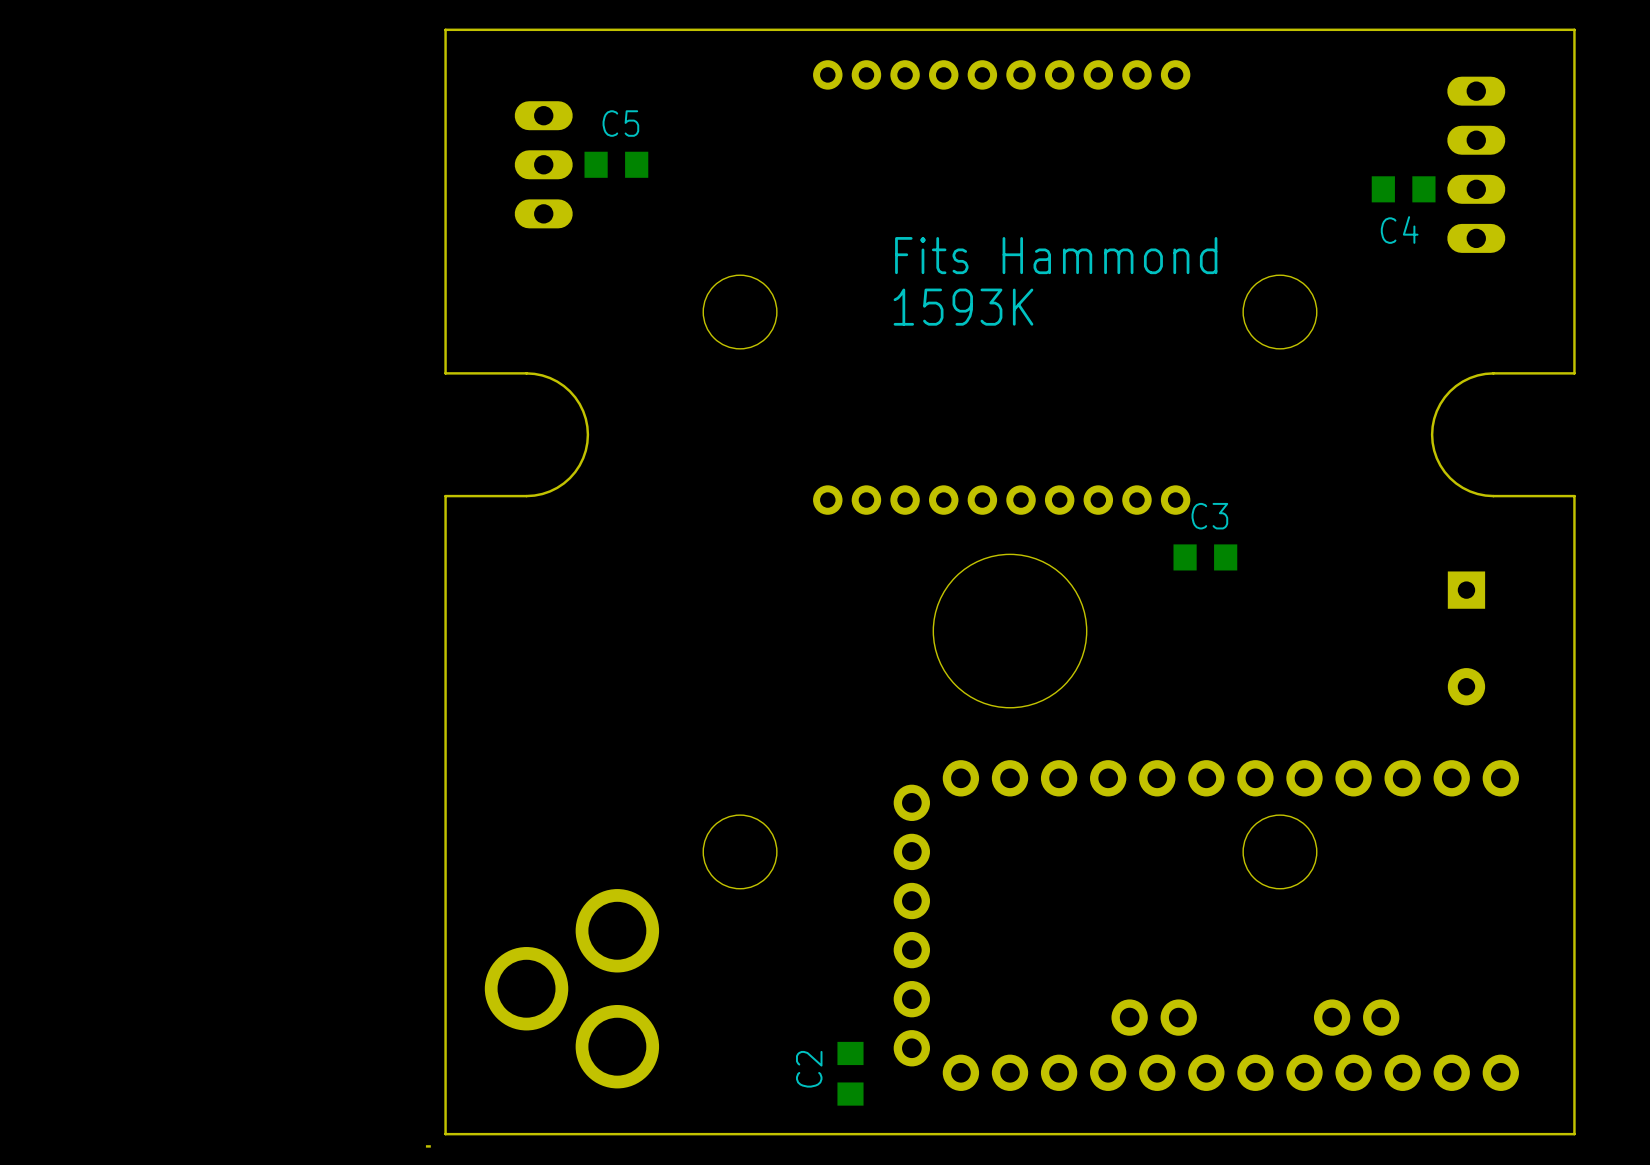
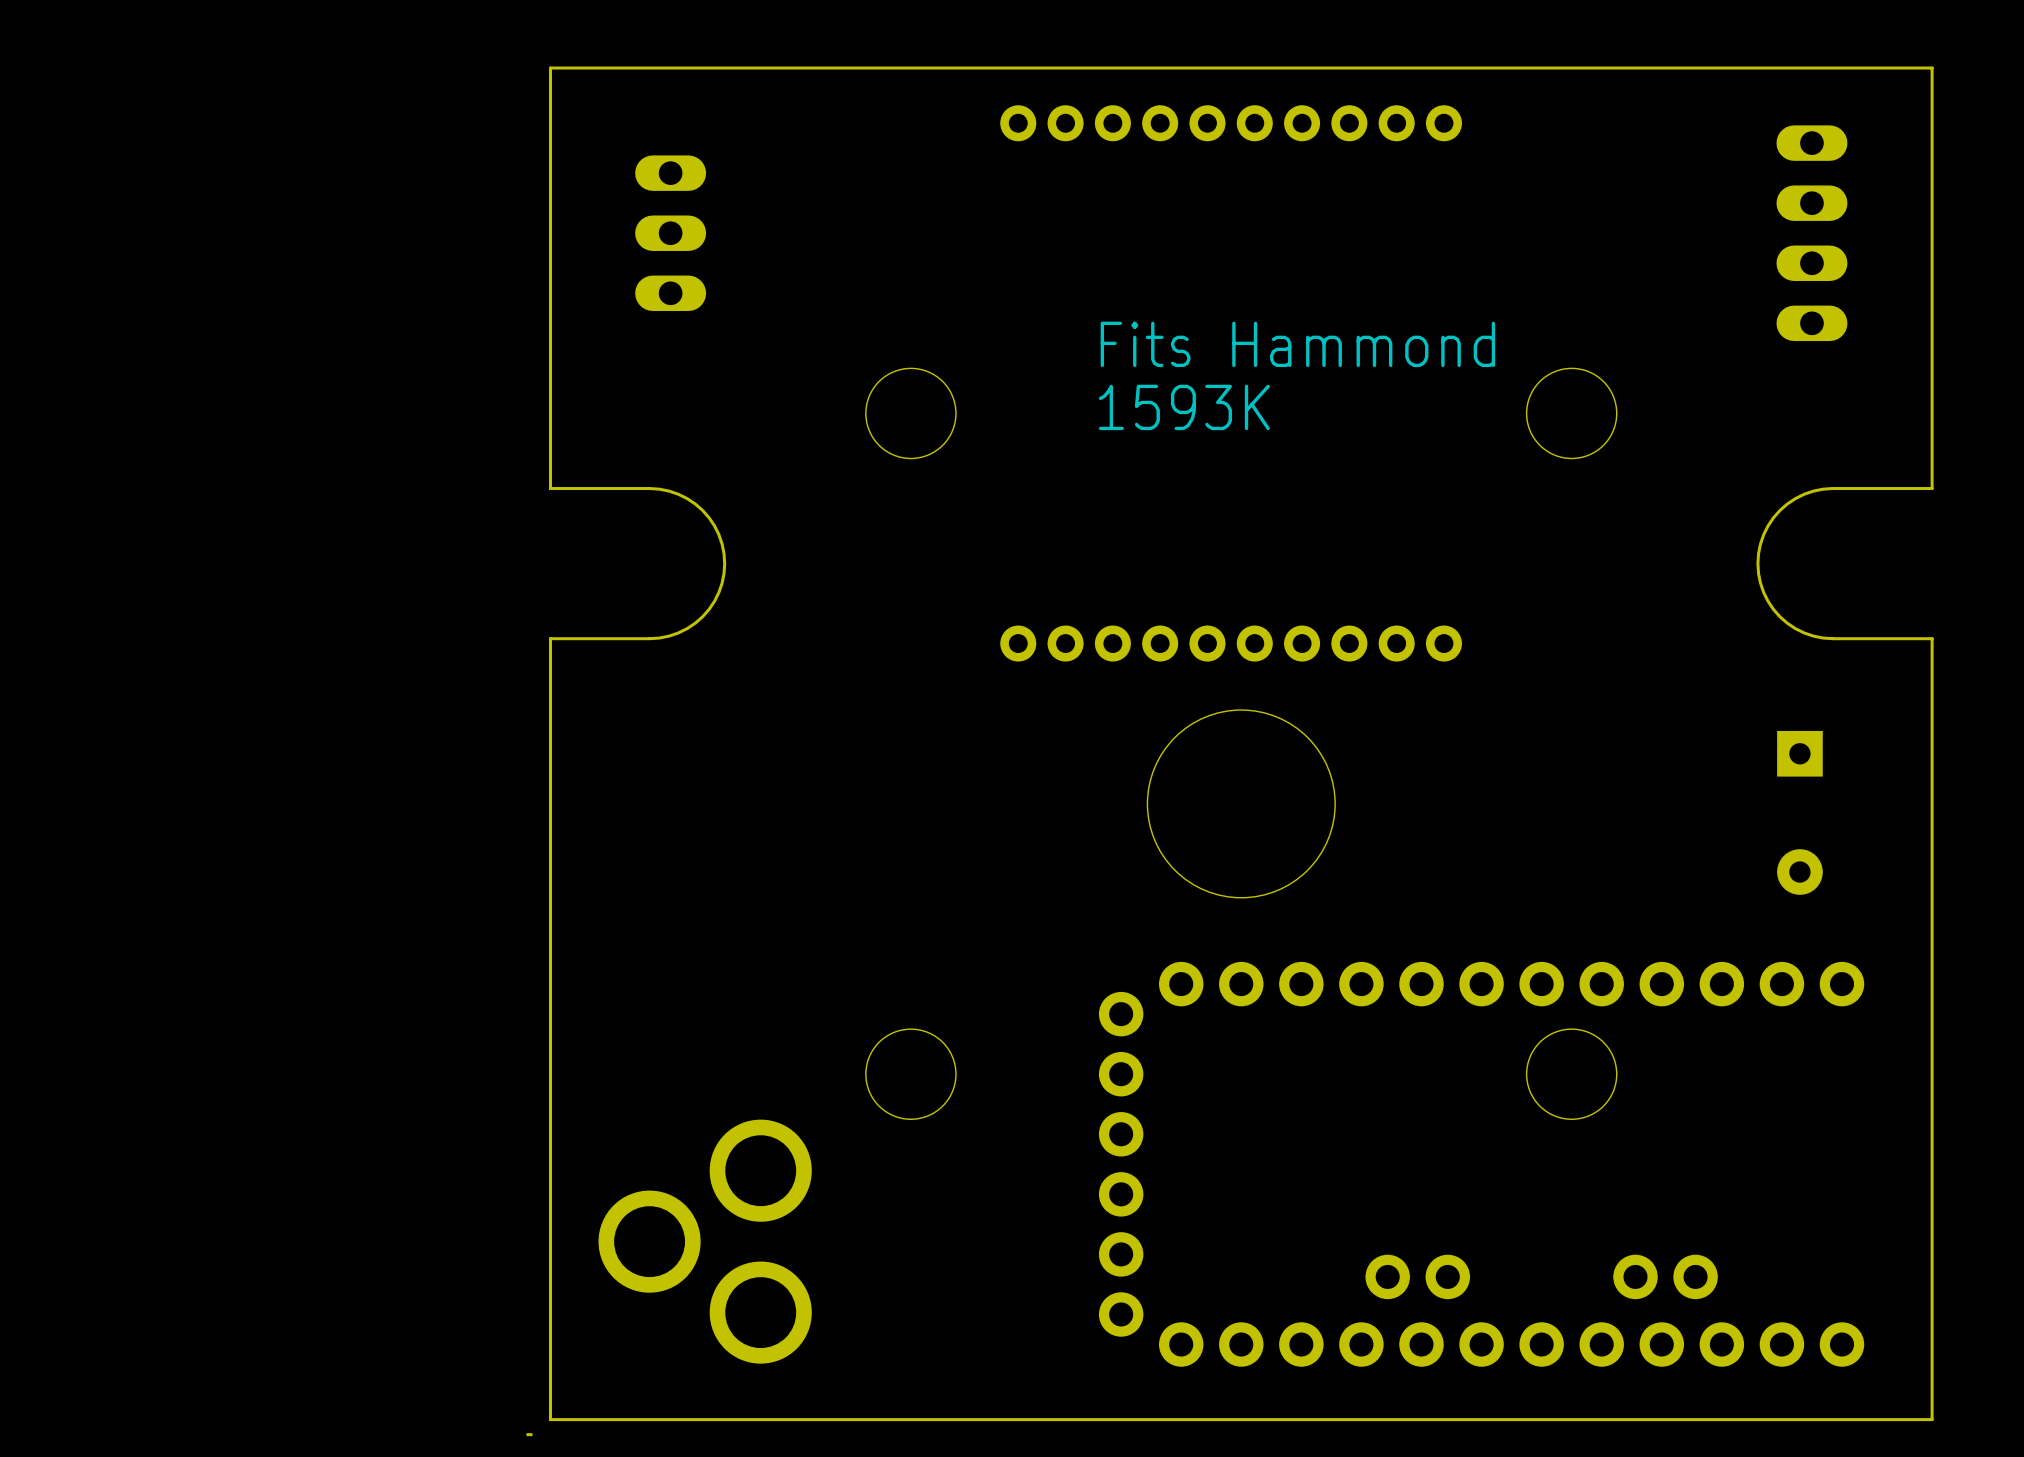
C5: (616, 164) -> none
C4: (1403, 189) -> none
C3: (1205, 557) -> none
C2: (850, 1073) -> none

